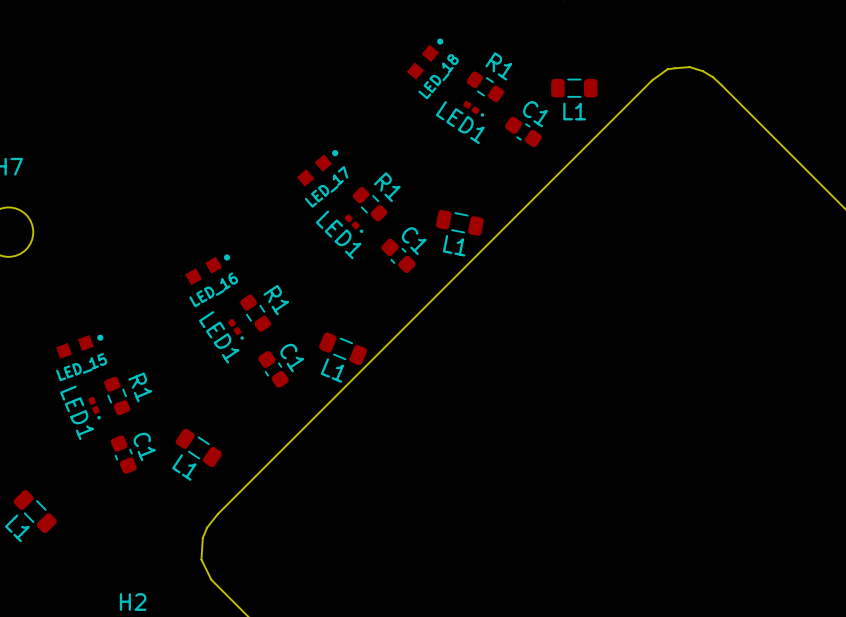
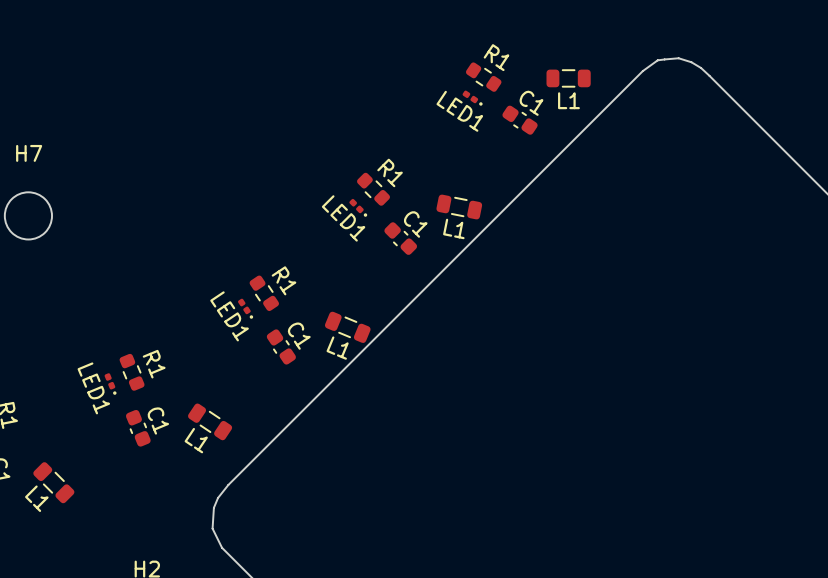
LED_18: (425, 59) -> none
LED_17: (317, 168) -> none
LED_16: (207, 269) -> none
LED_15: (79, 346) -> none

